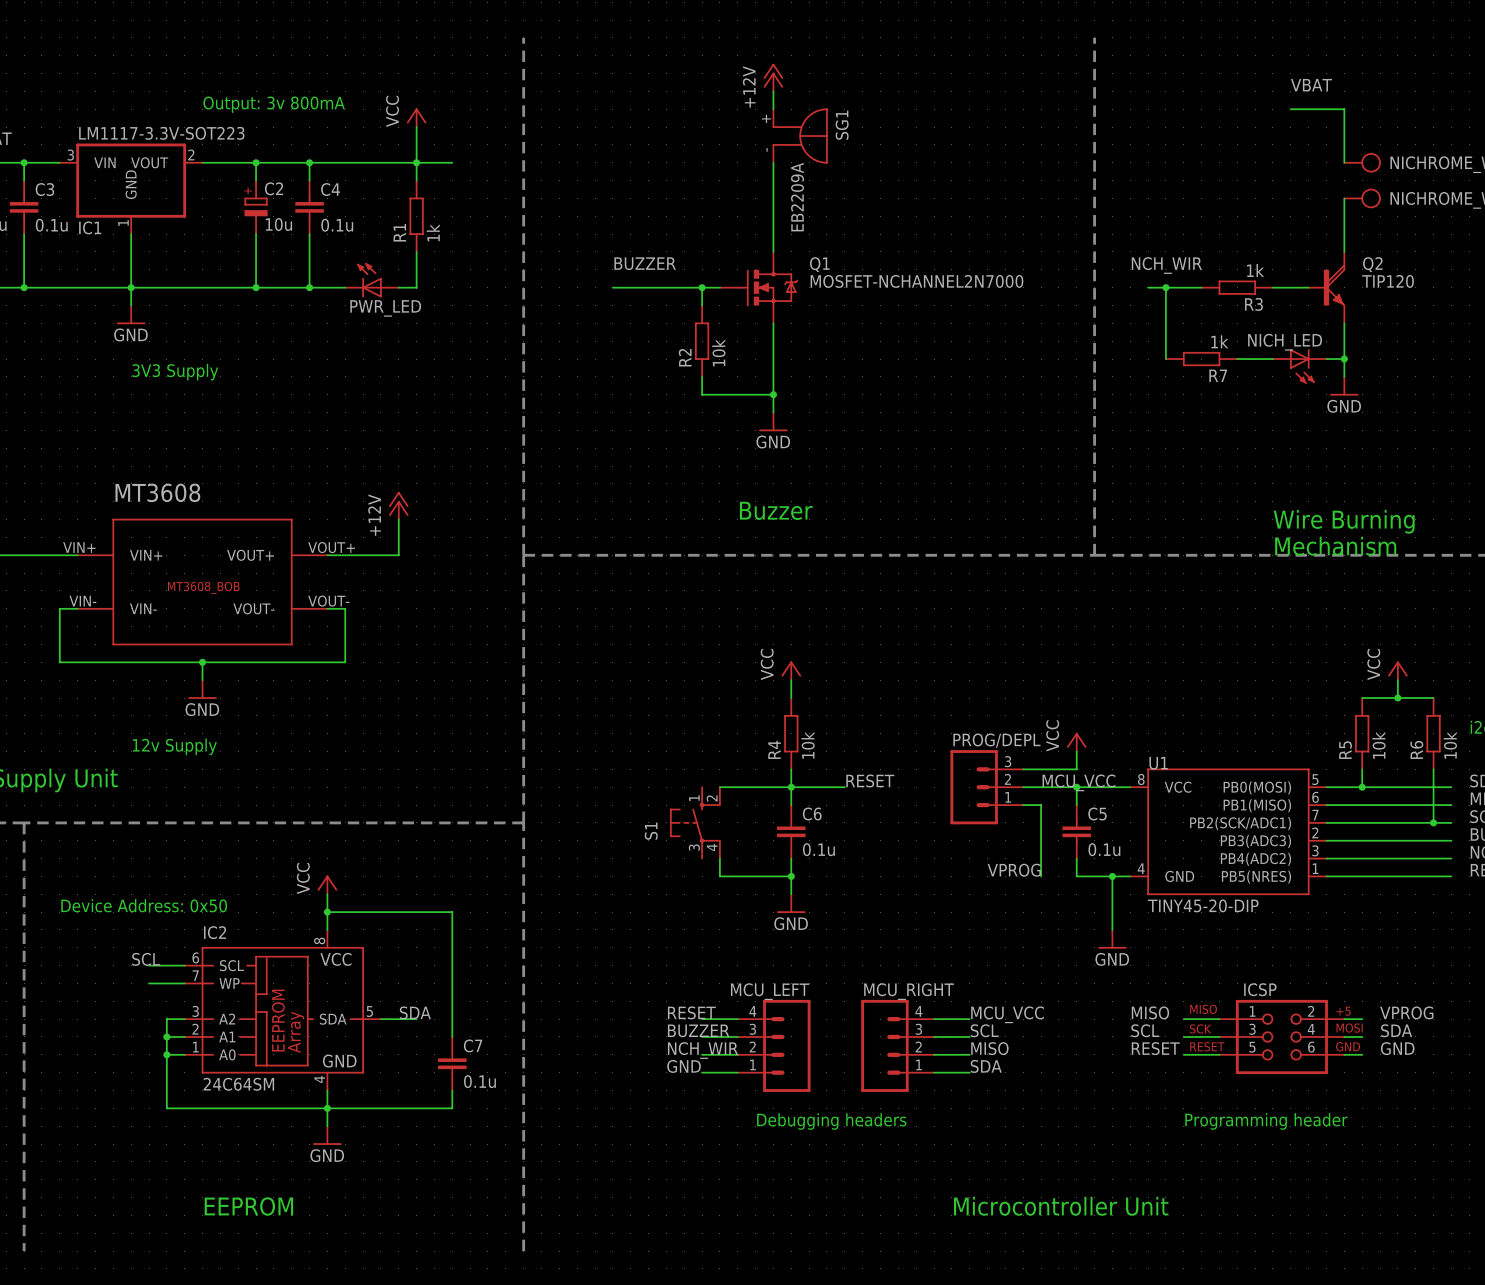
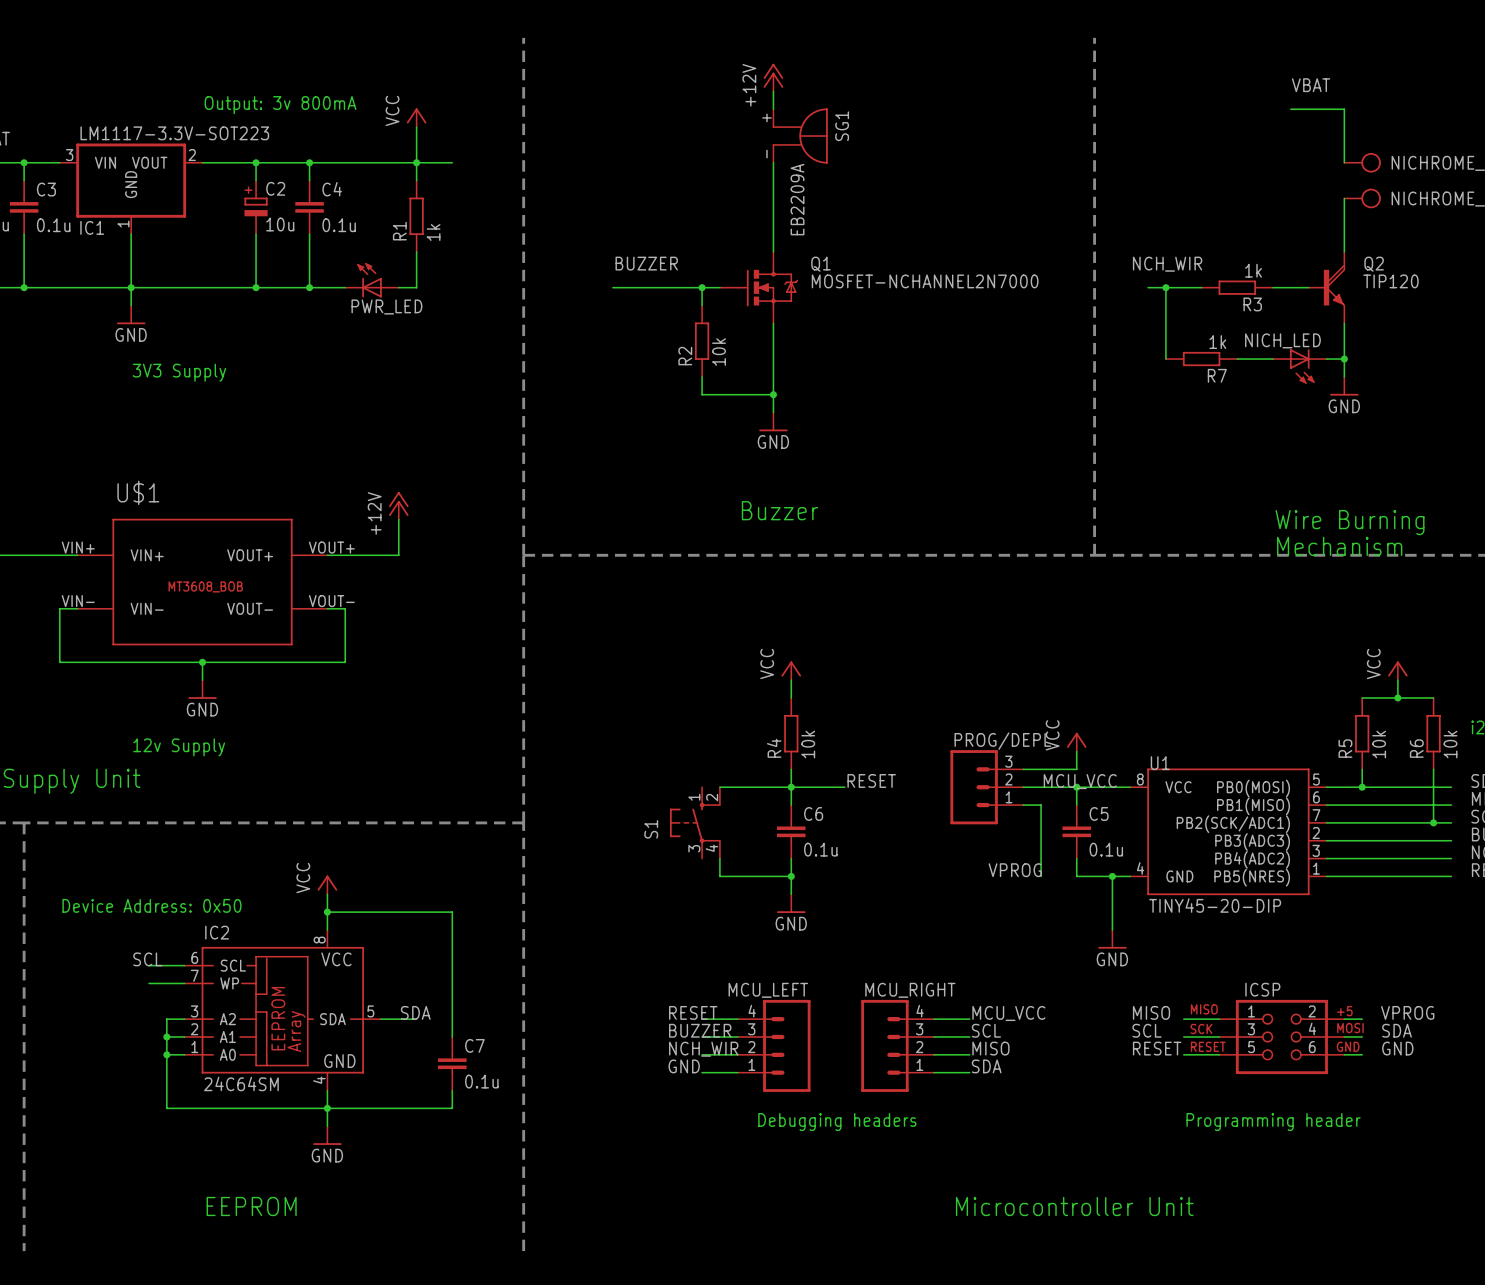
MT3608 name: MT3608 (157, 492) -> U$1 (138, 492)

